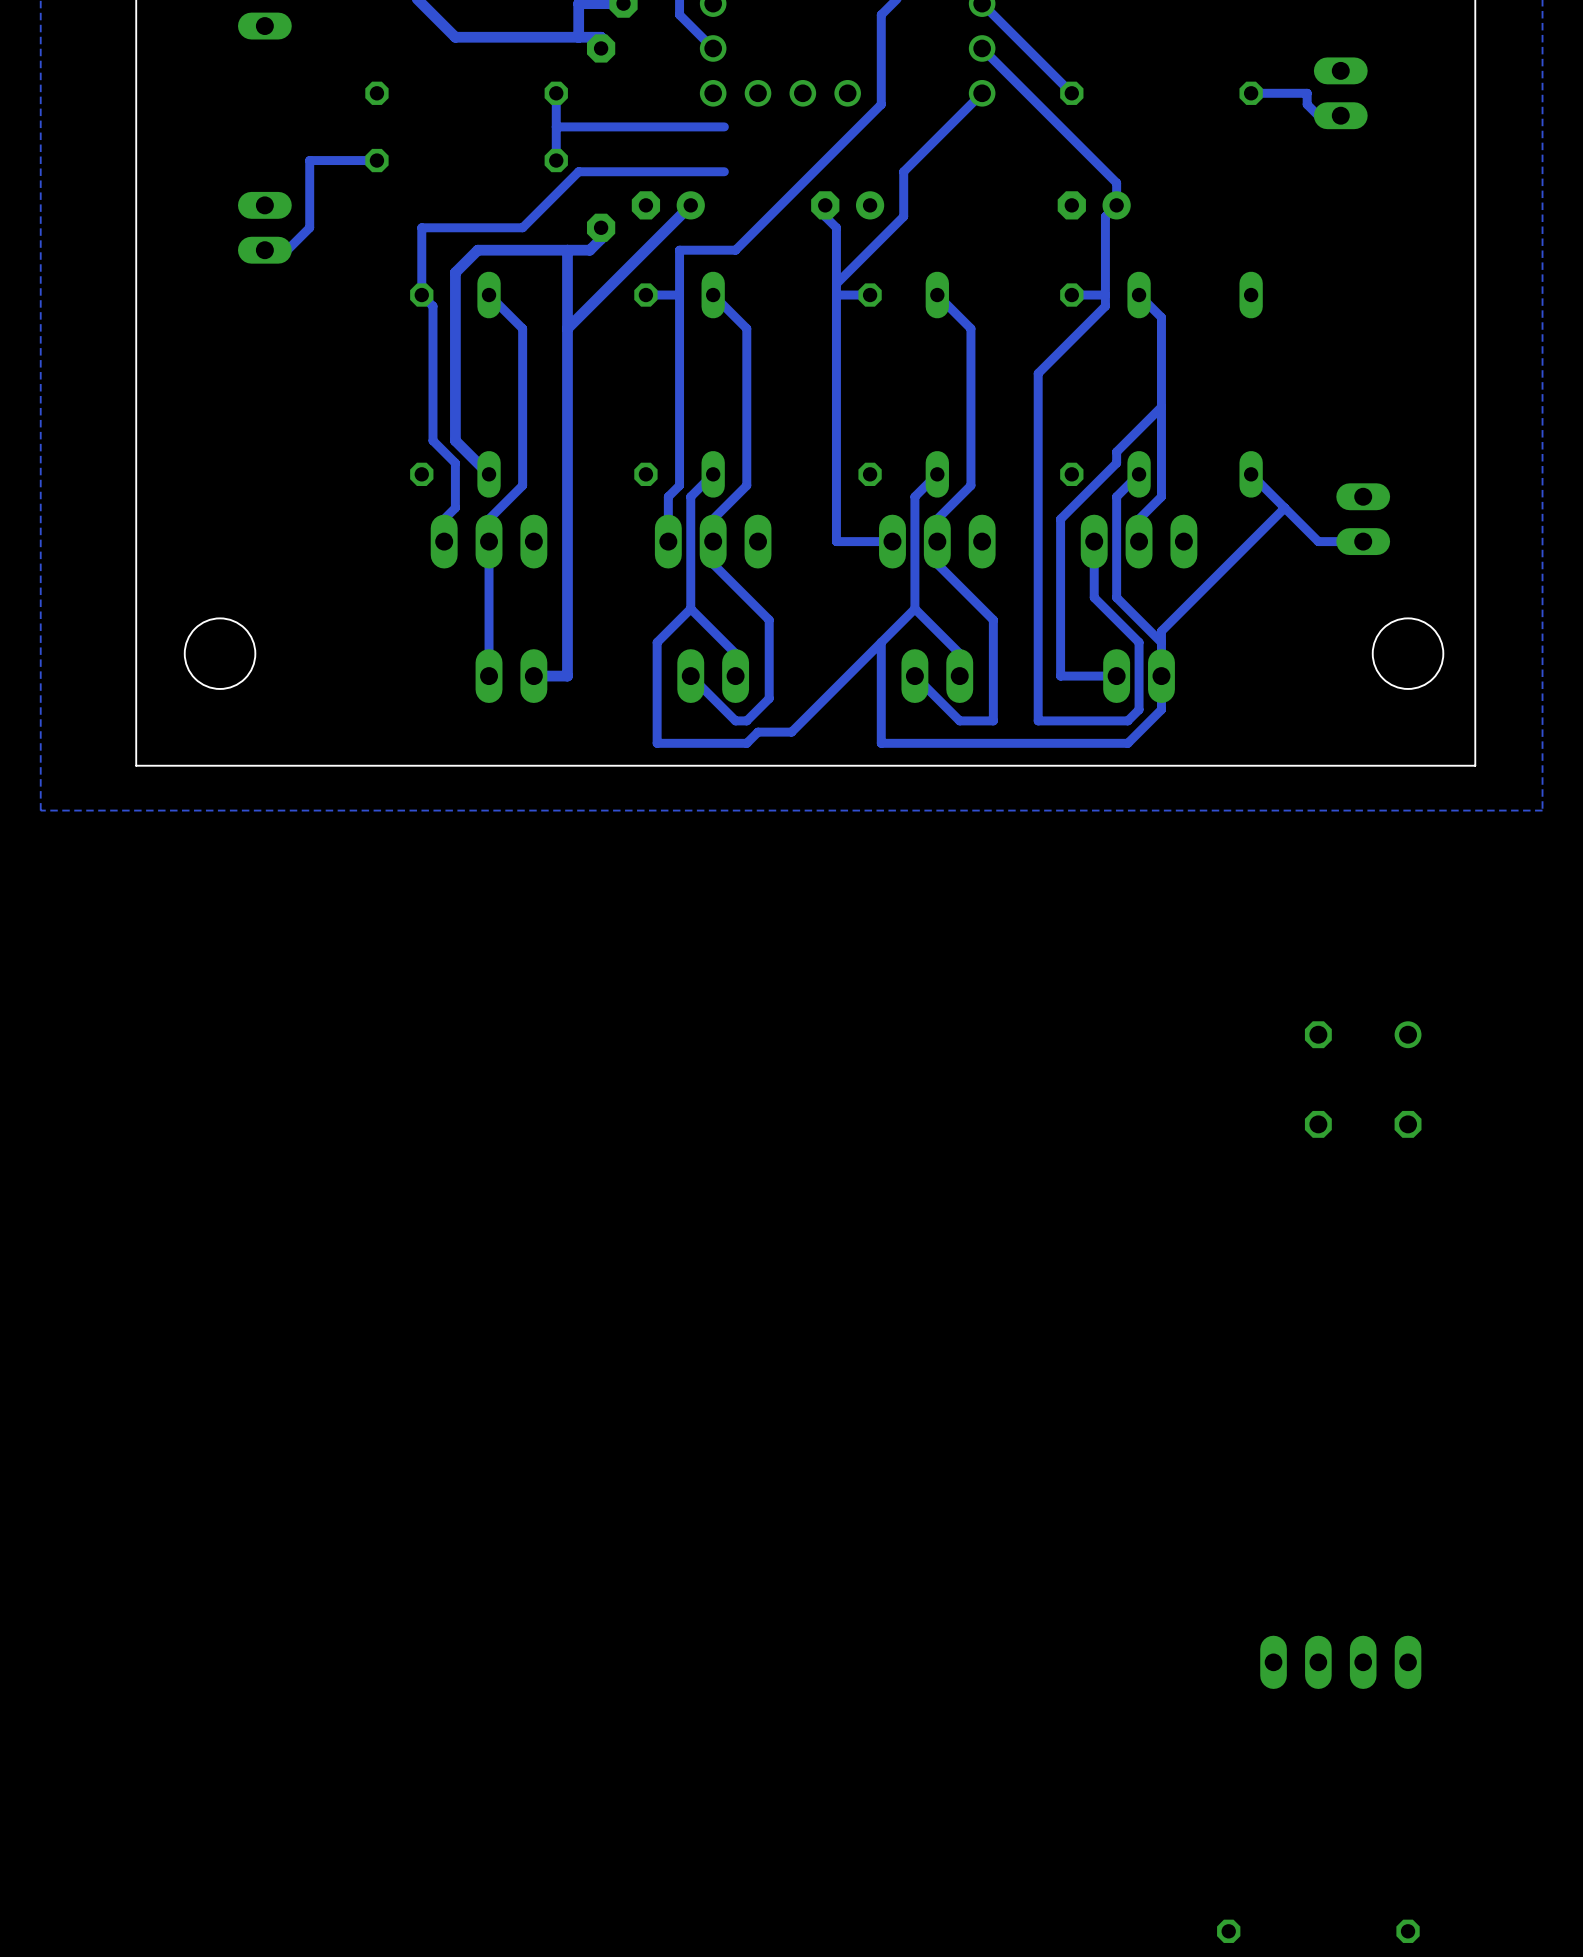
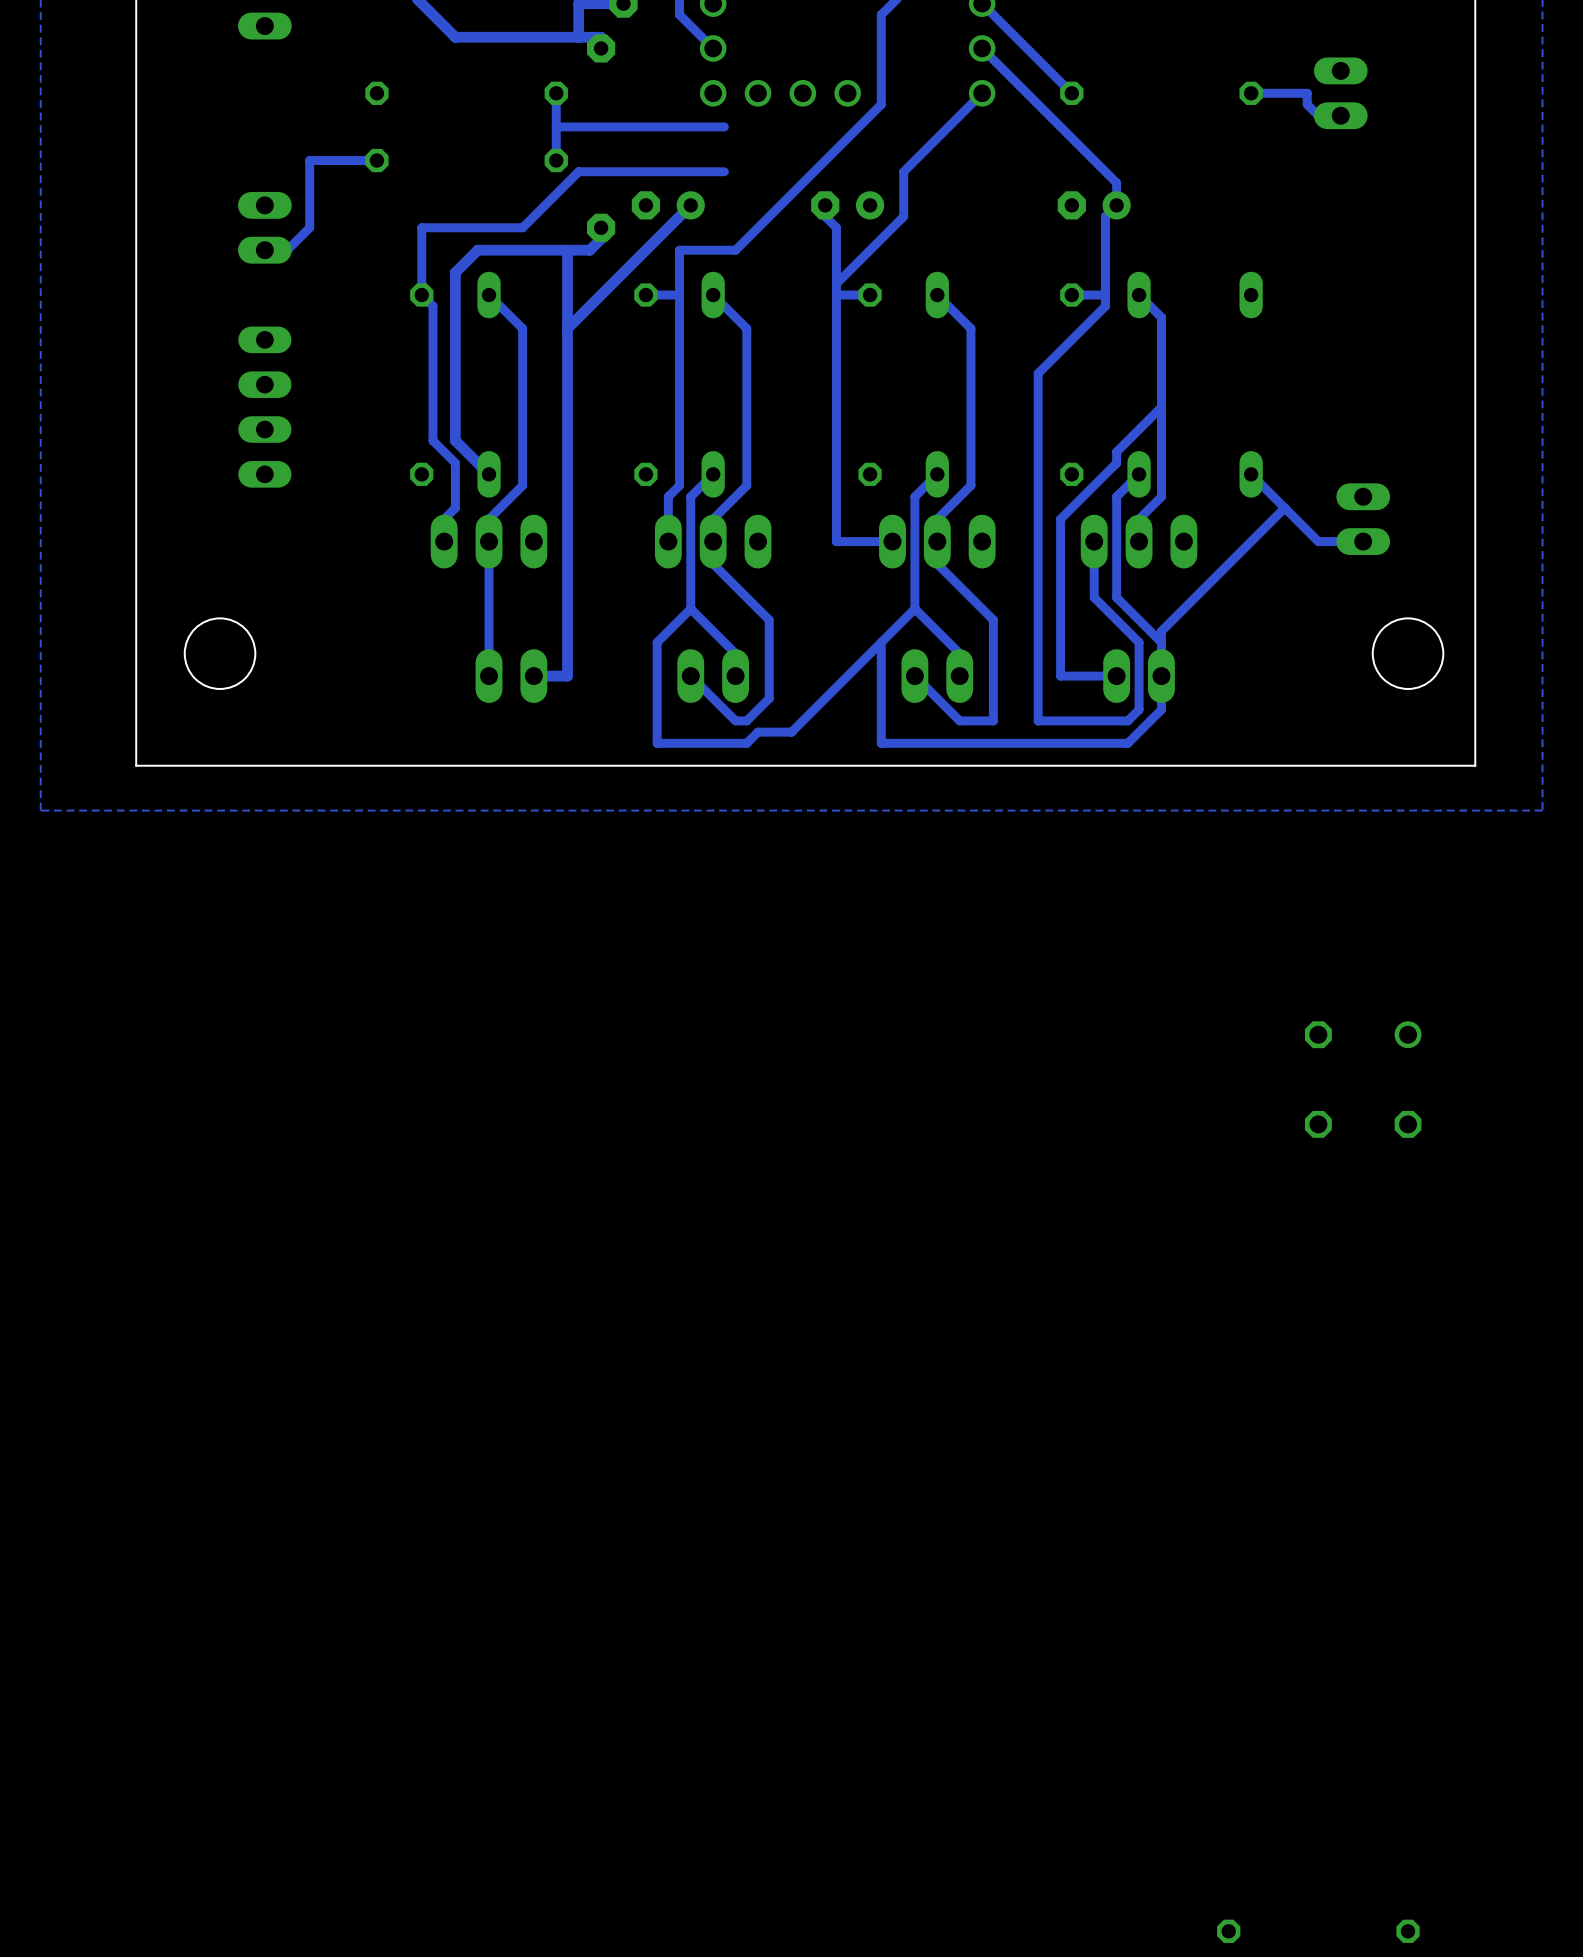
part: none -> (264, 407)
part: (1340, 1662) -> none

